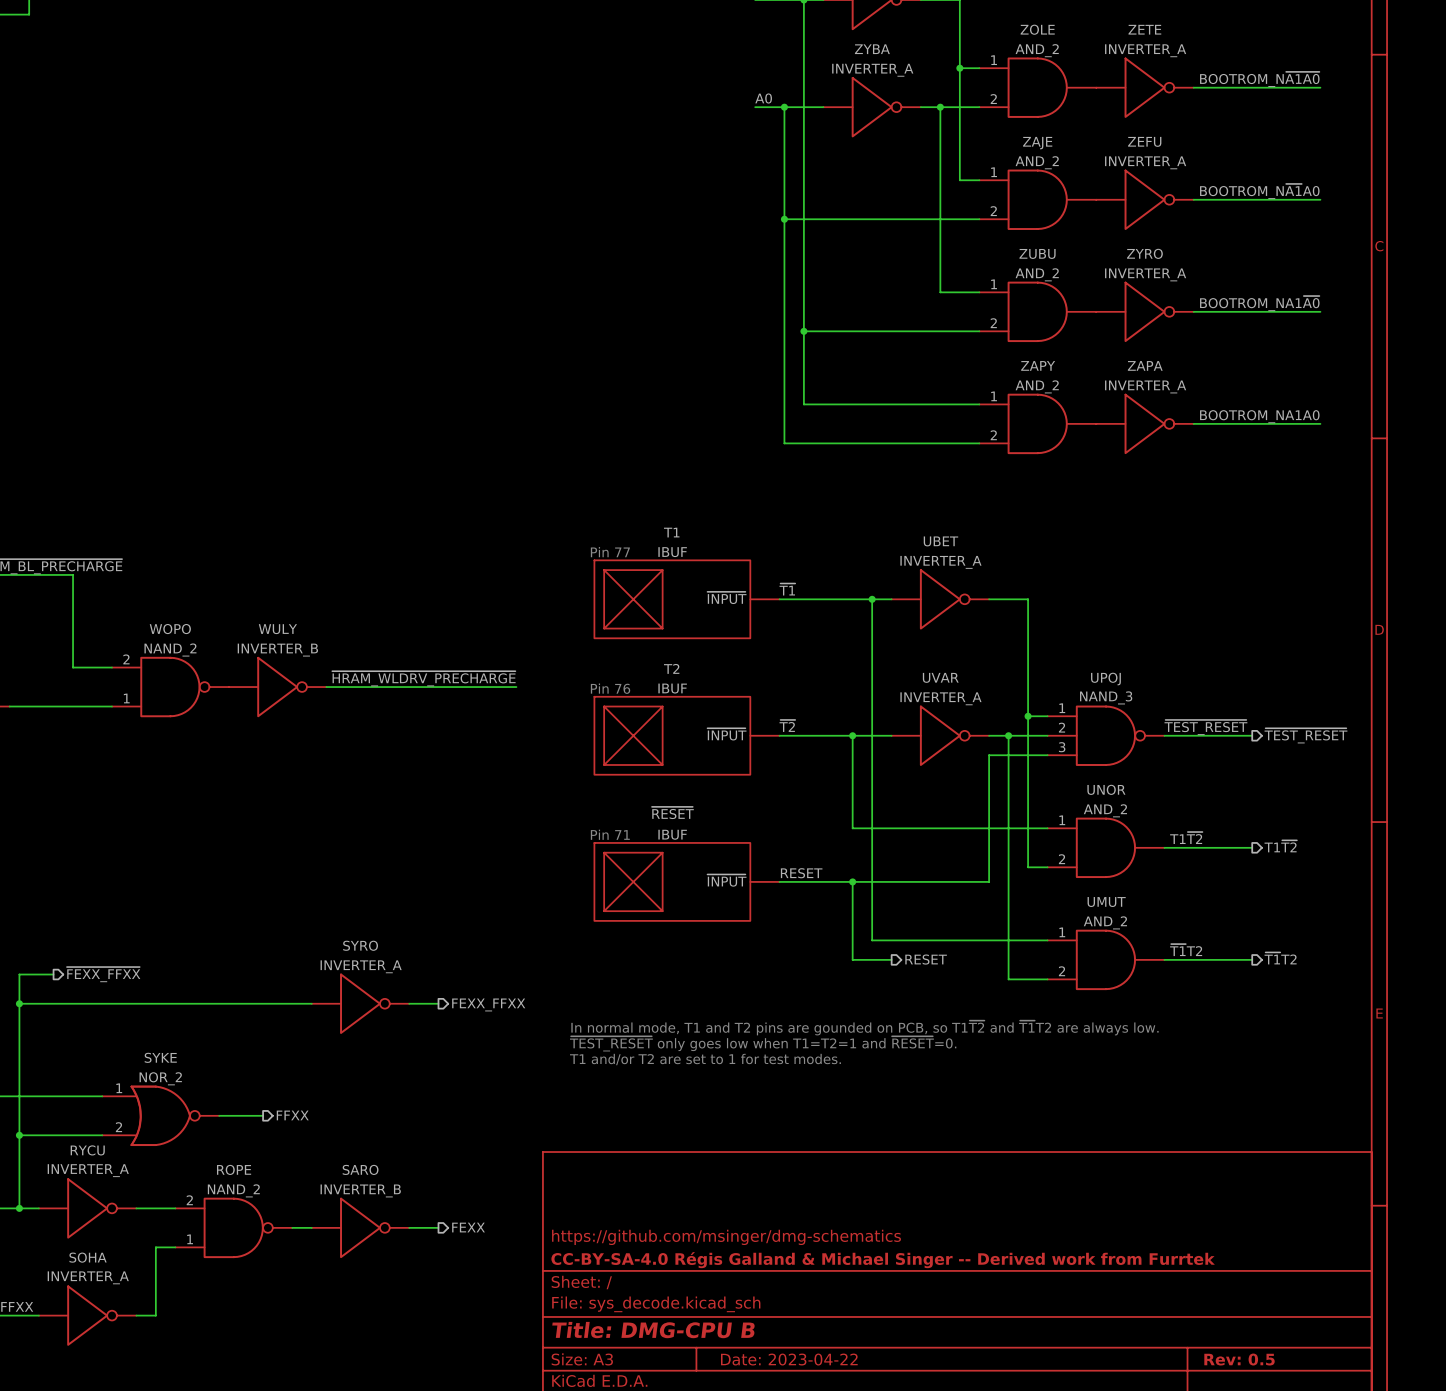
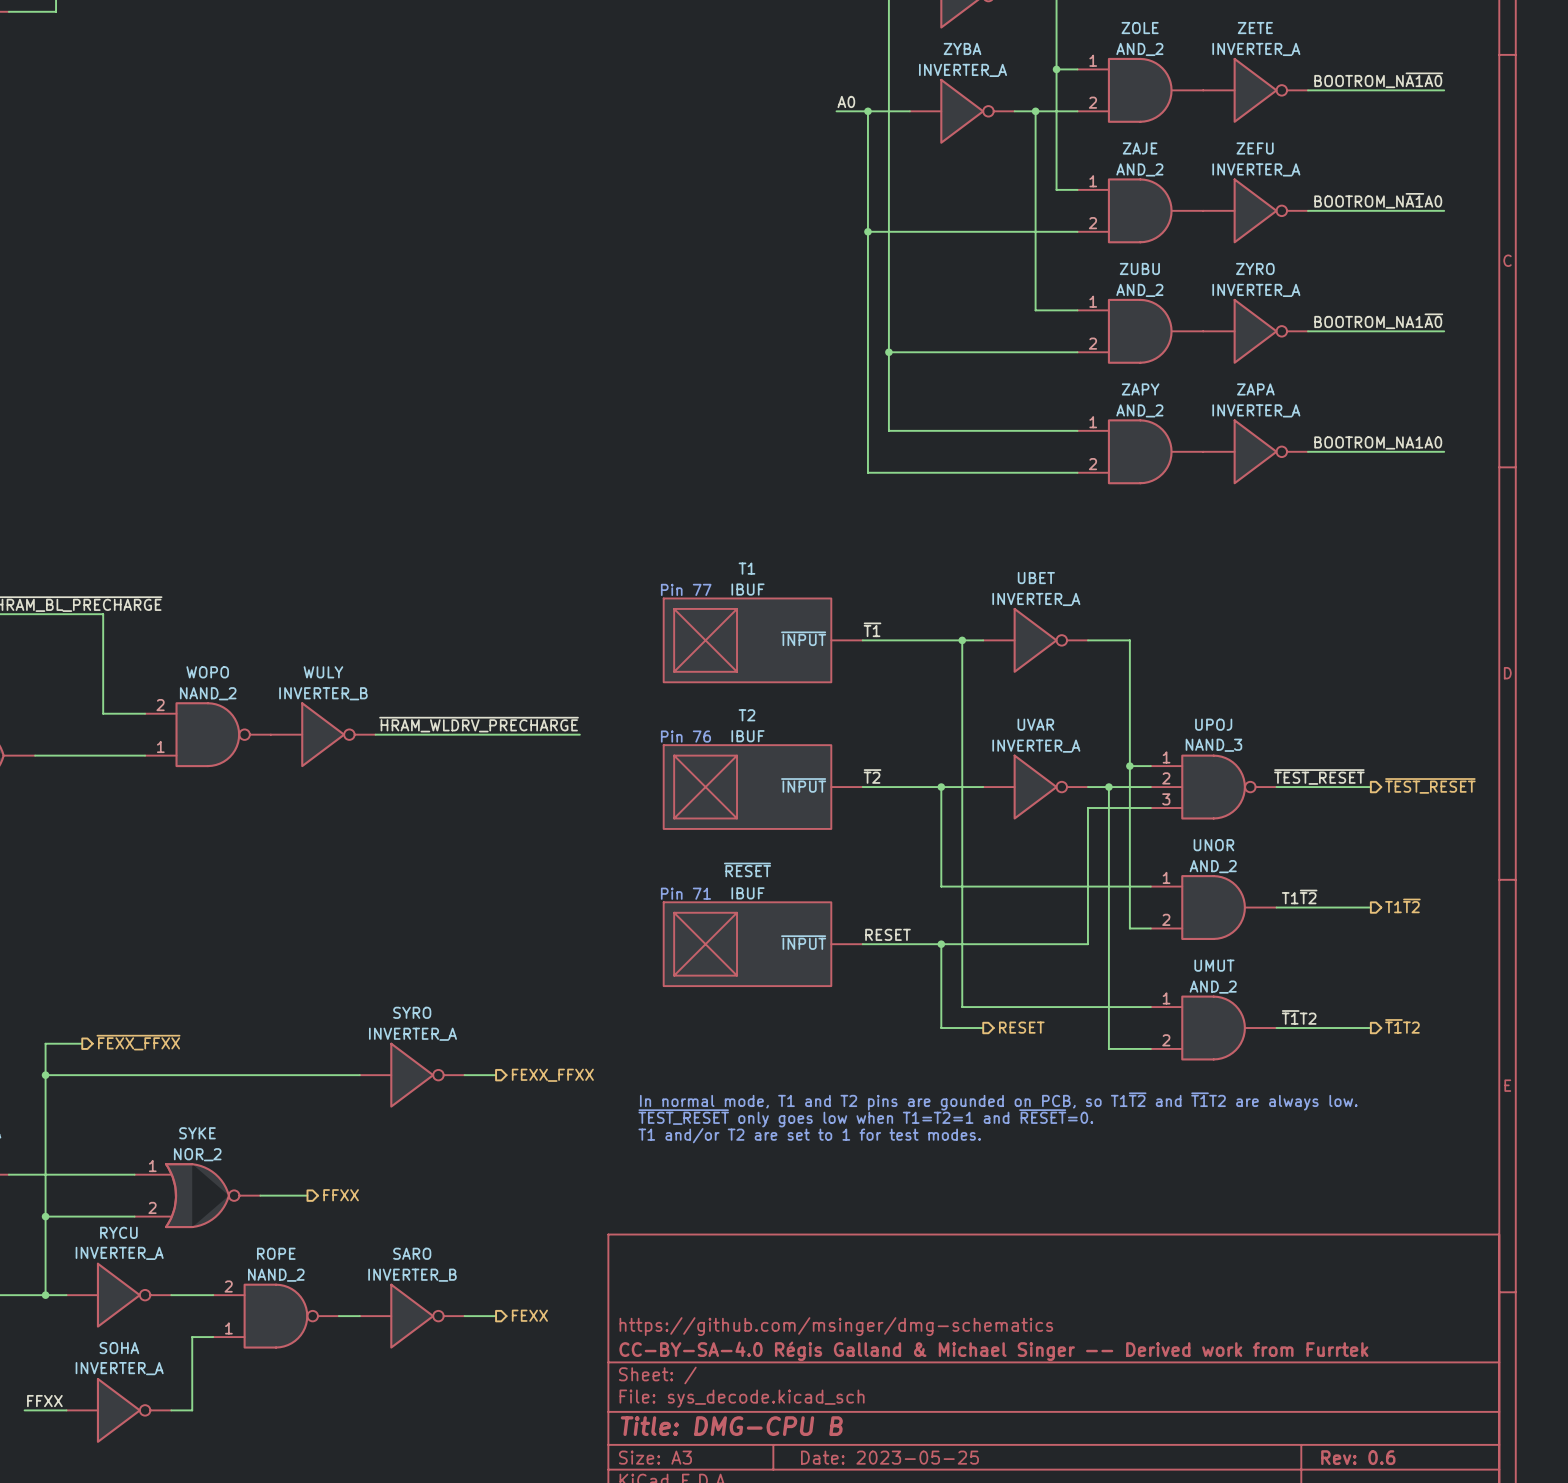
title block: Date: 2023-04-22 (789, 1359) -> Date: 2023-05-25 (889, 1457)
title block: Rev: 0.5 (1239, 1359) -> Rev: 0.6 (1358, 1457)

